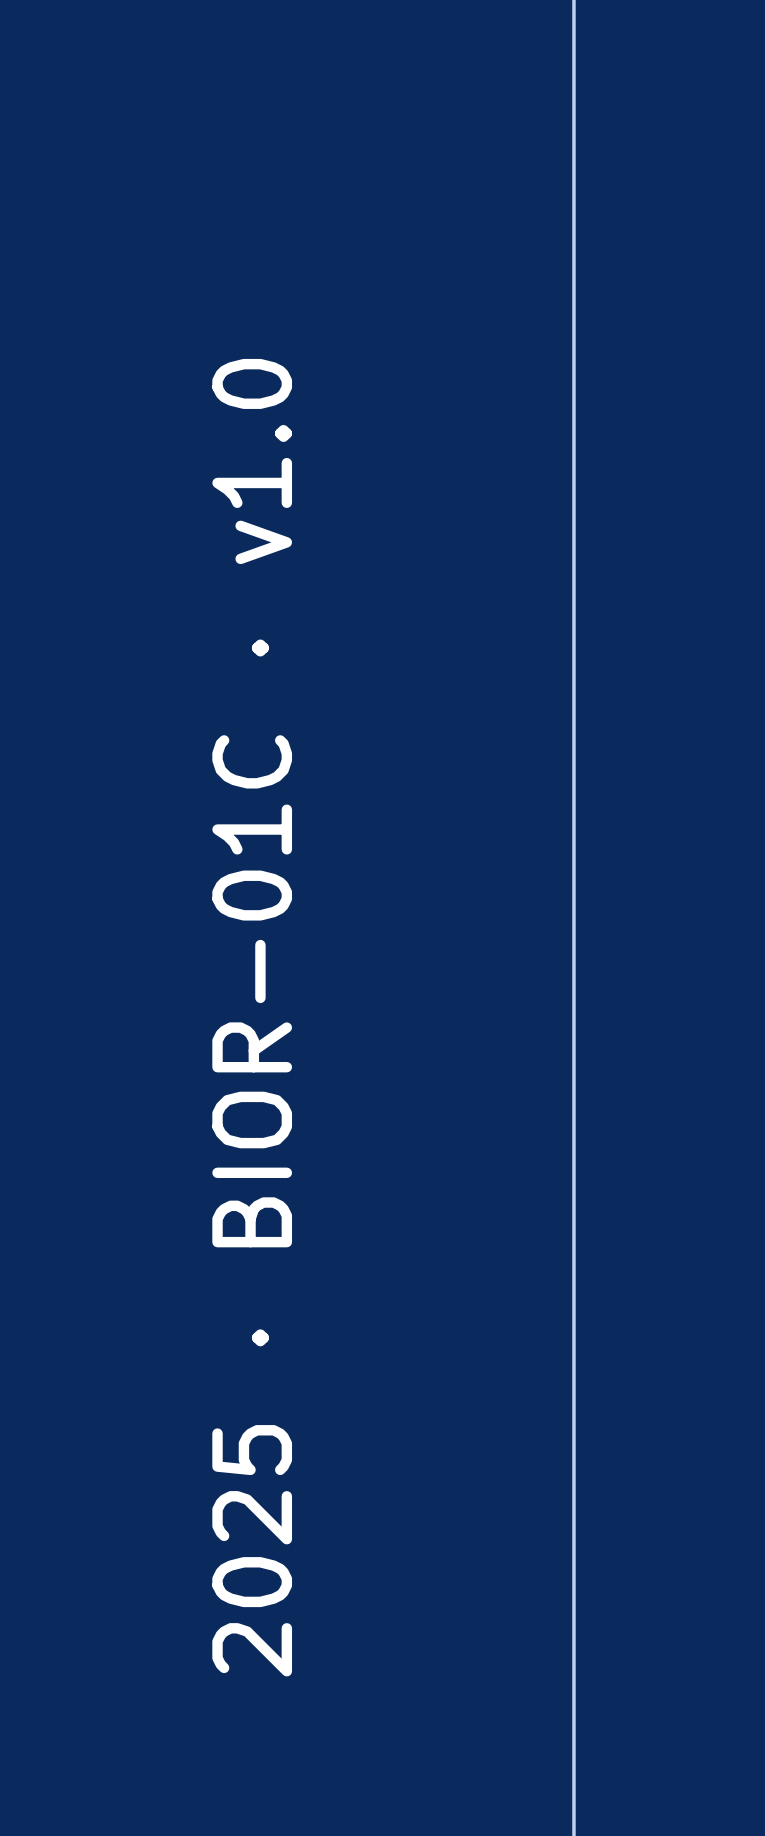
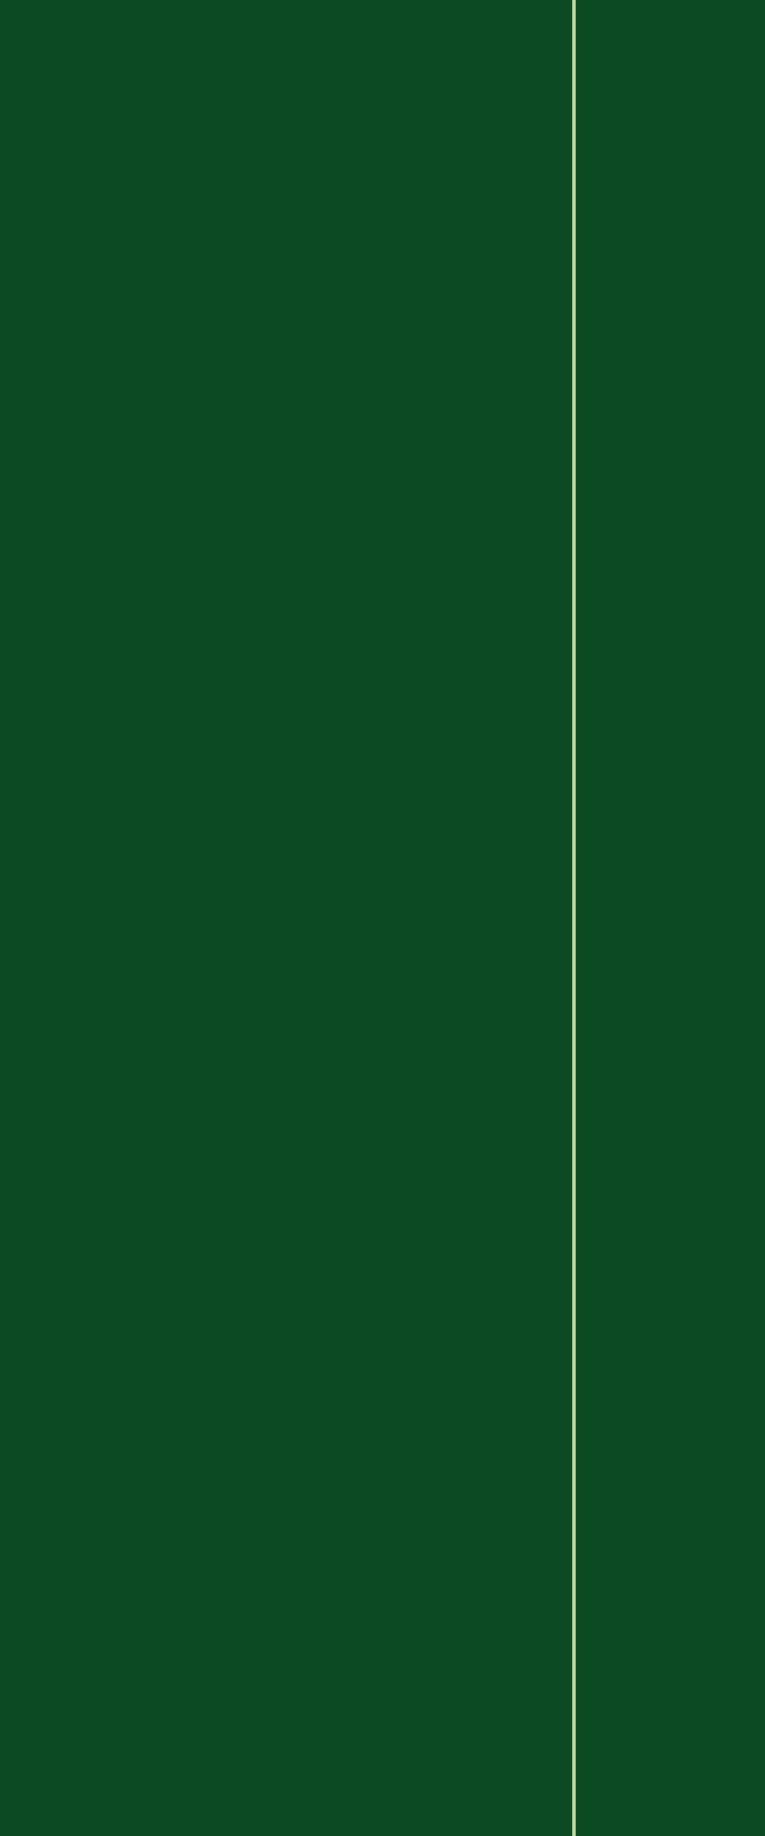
text: 2025 · BIOR-01C · v1.0 (252, 1017) -> none

